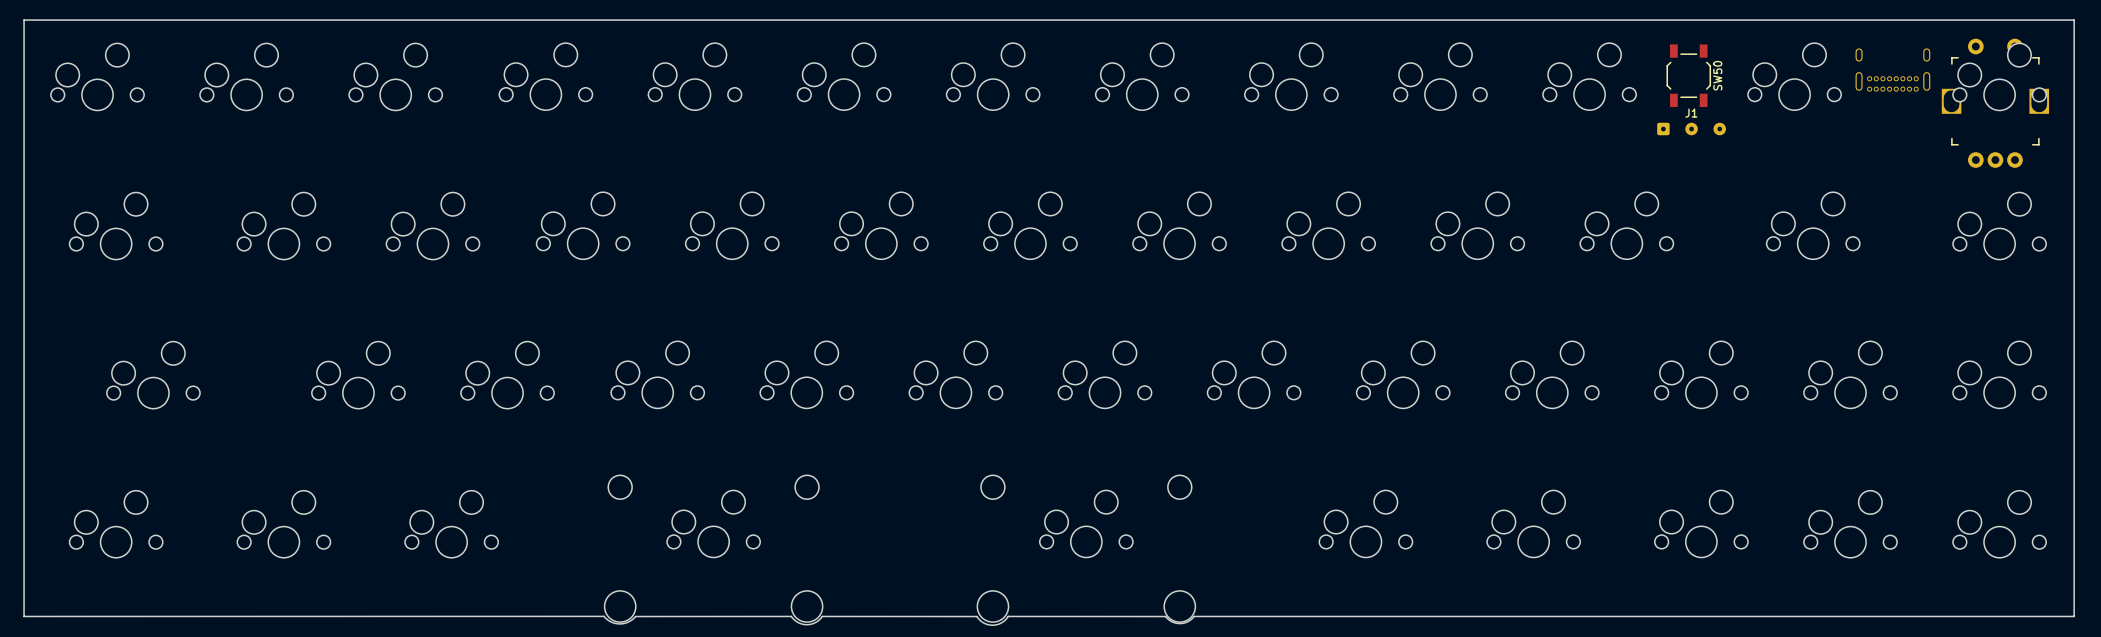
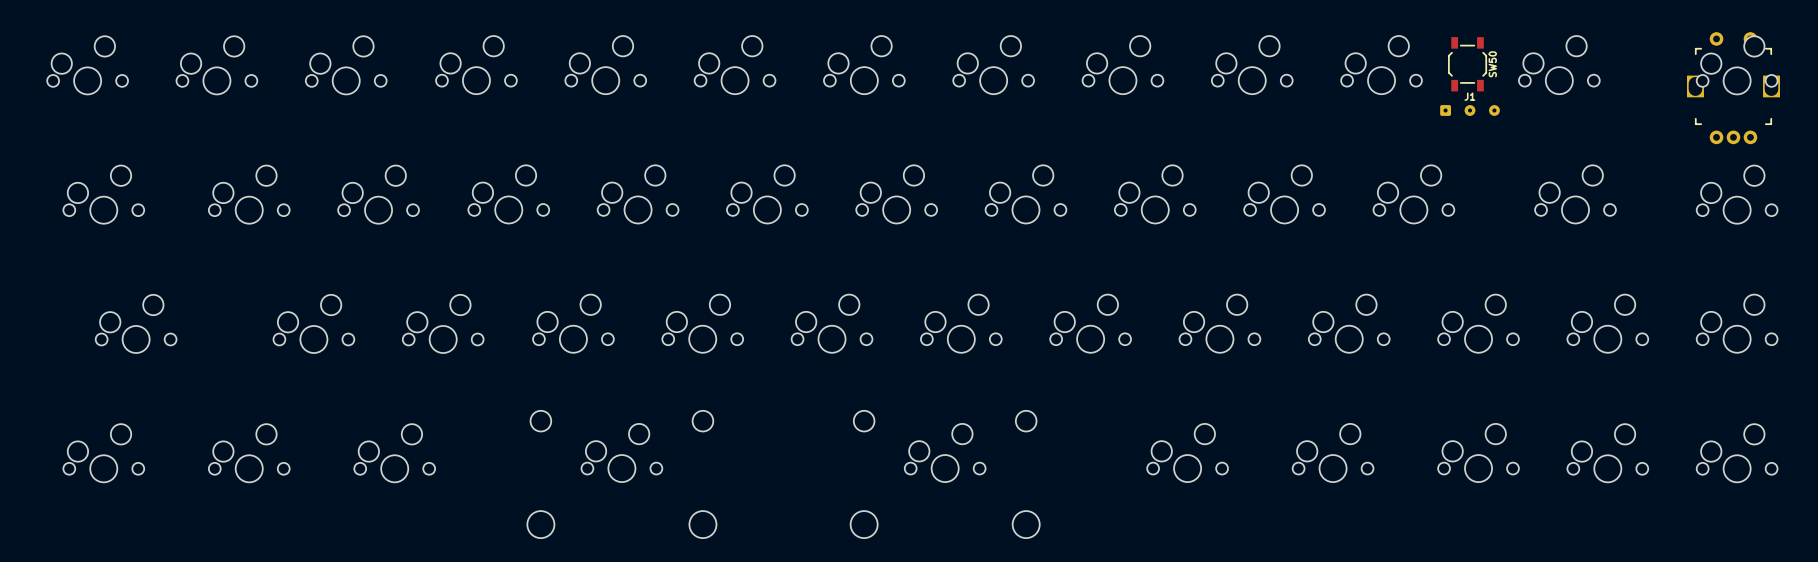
board edge: (24, 20) (24, 616) (603, 616) (612, 622) (619, 623) (627, 622) (635, 616) (791, 616) (798, 622) (806, 624) (815, 622) (822, 616) (976, 616) (983, 622) (992, 625) (1001, 622) (1008, 616) (1165, 616) (1171, 621) (1179, 623) (1187, 621) (1194, 616) (2074, 616) (2074, 20) (24, 20) -> none
part: (1892, 70) -> none

